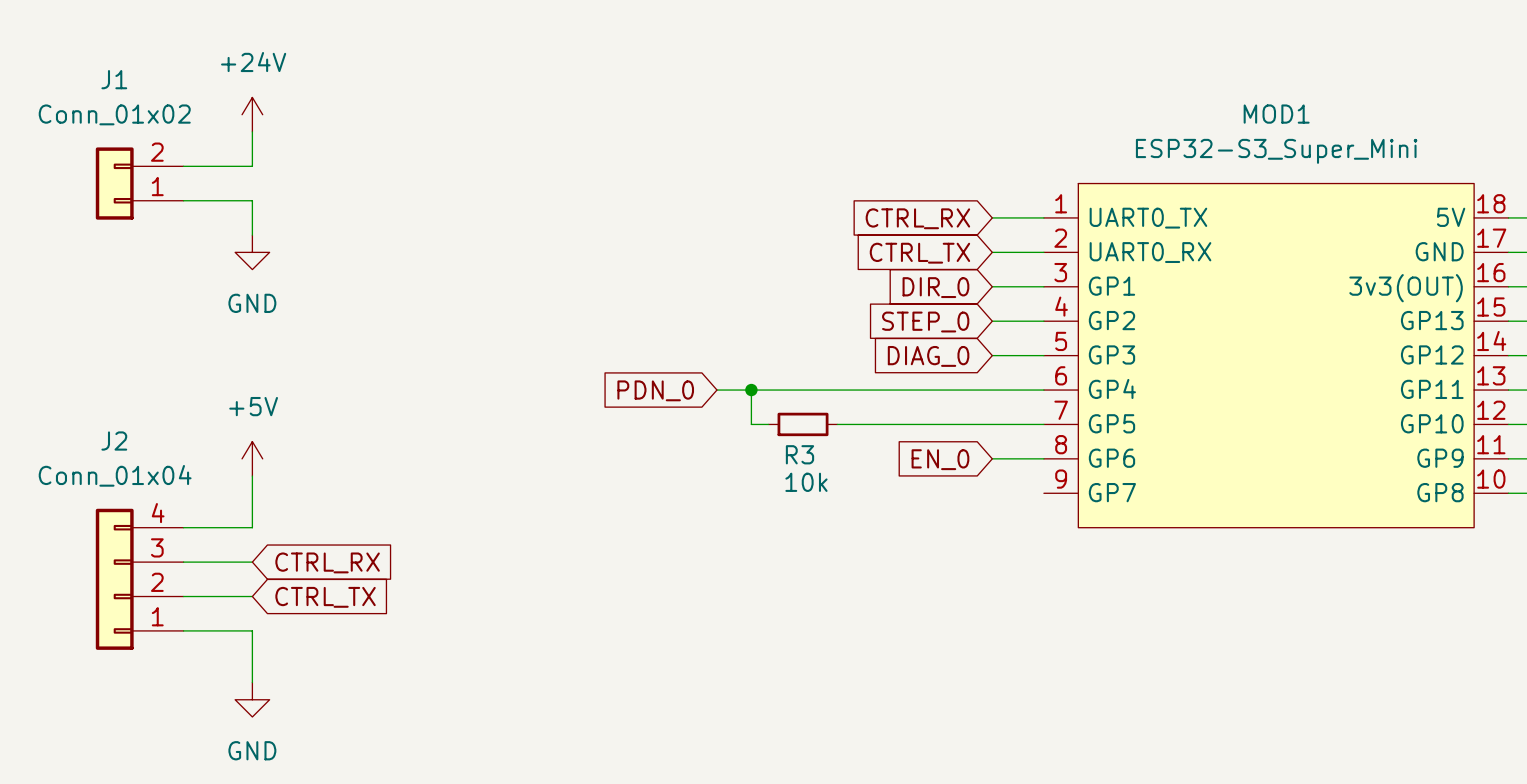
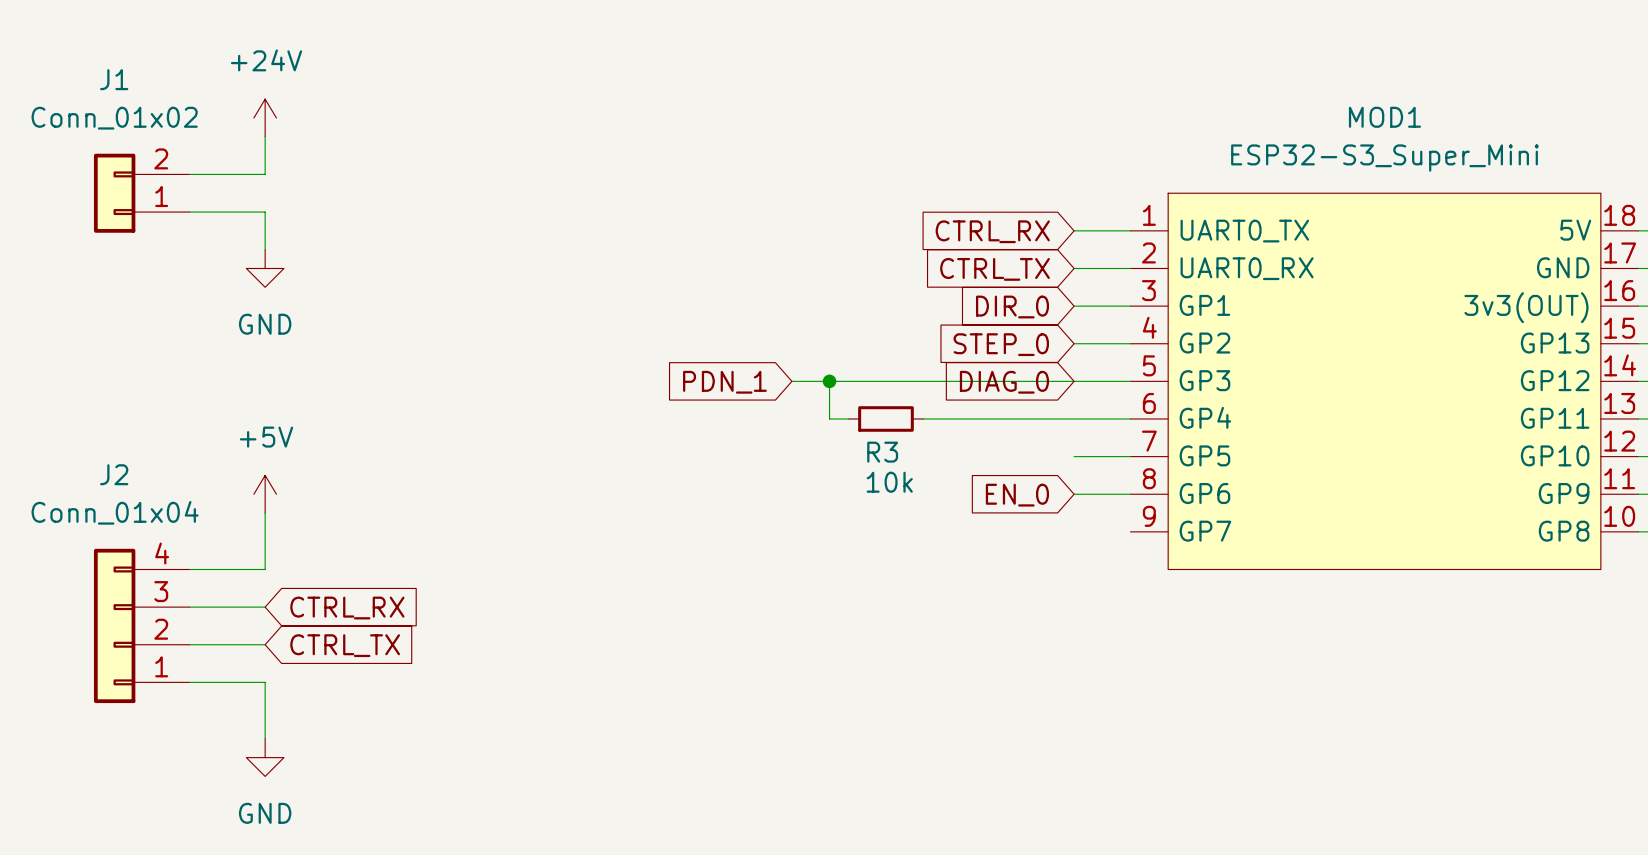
wire: none -> (791, 381) (1074, 381)
global label: PDN_0 (655, 390) -> PDN_1 (724, 382)
wire: (716, 390) (768, 390) -> (829, 381) (829, 418)
wire: (751, 390) (751, 424) (768, 424) -> none
junction position: (751, 390) -> (829, 381)
wire: (785, 390) (854, 390) -> none
R3 position: (803, 424) -> (885, 418)
wire: (837, 424) (992, 424) -> none

